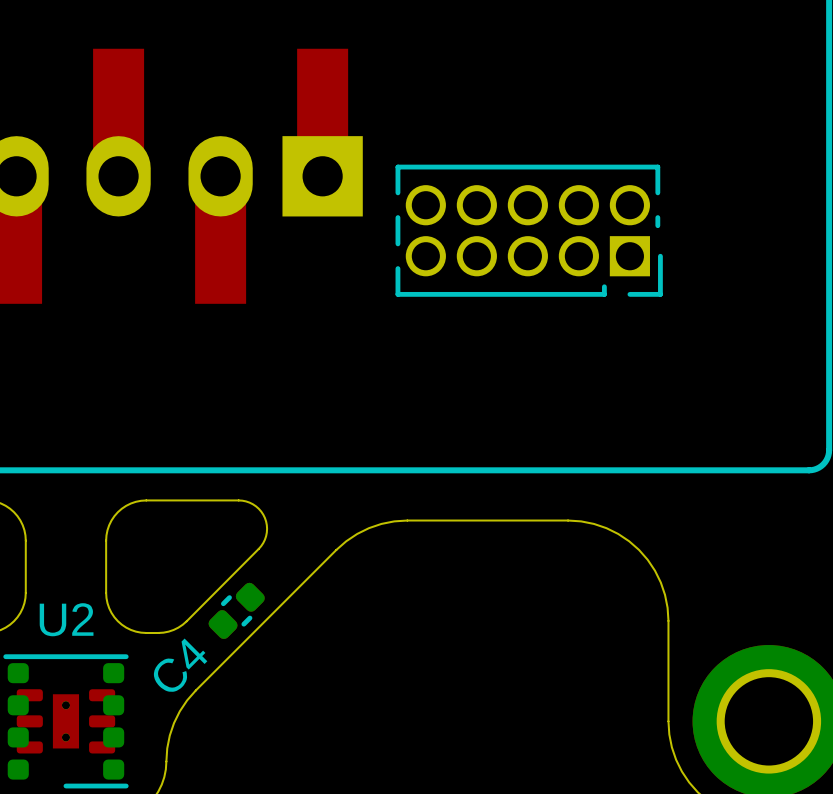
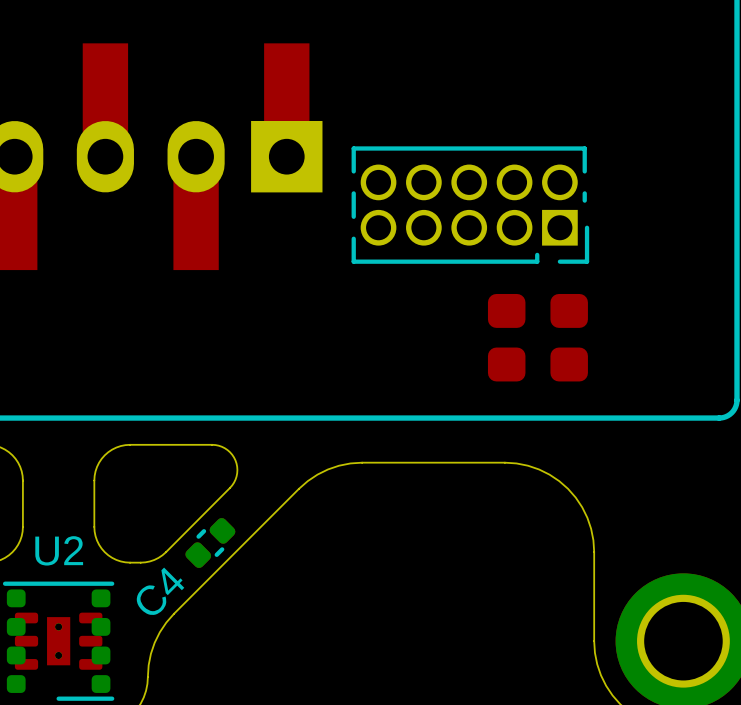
part: none -> (537, 310)
part: none -> (537, 364)

